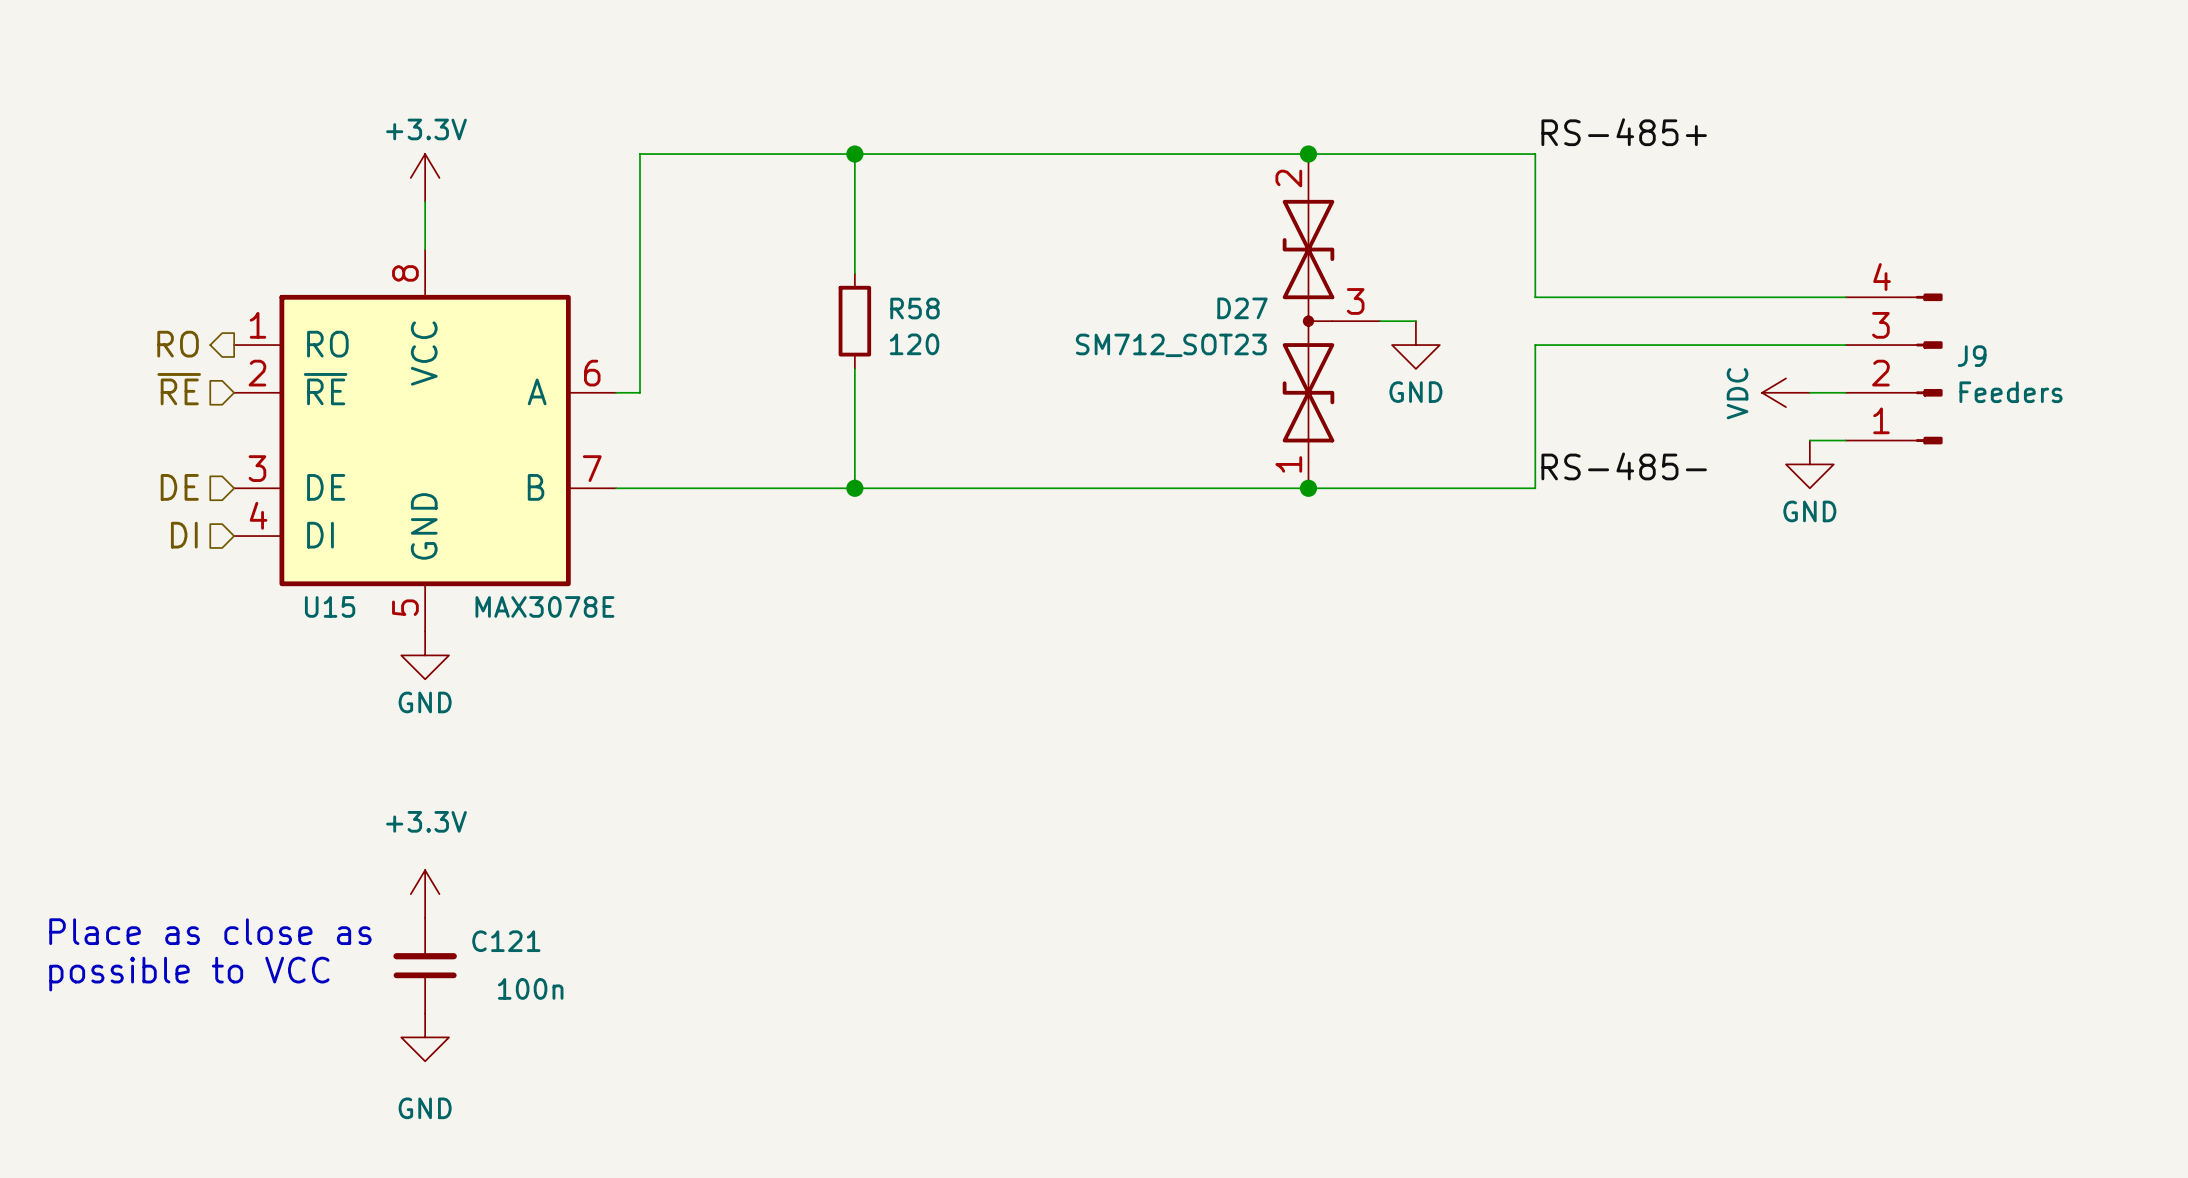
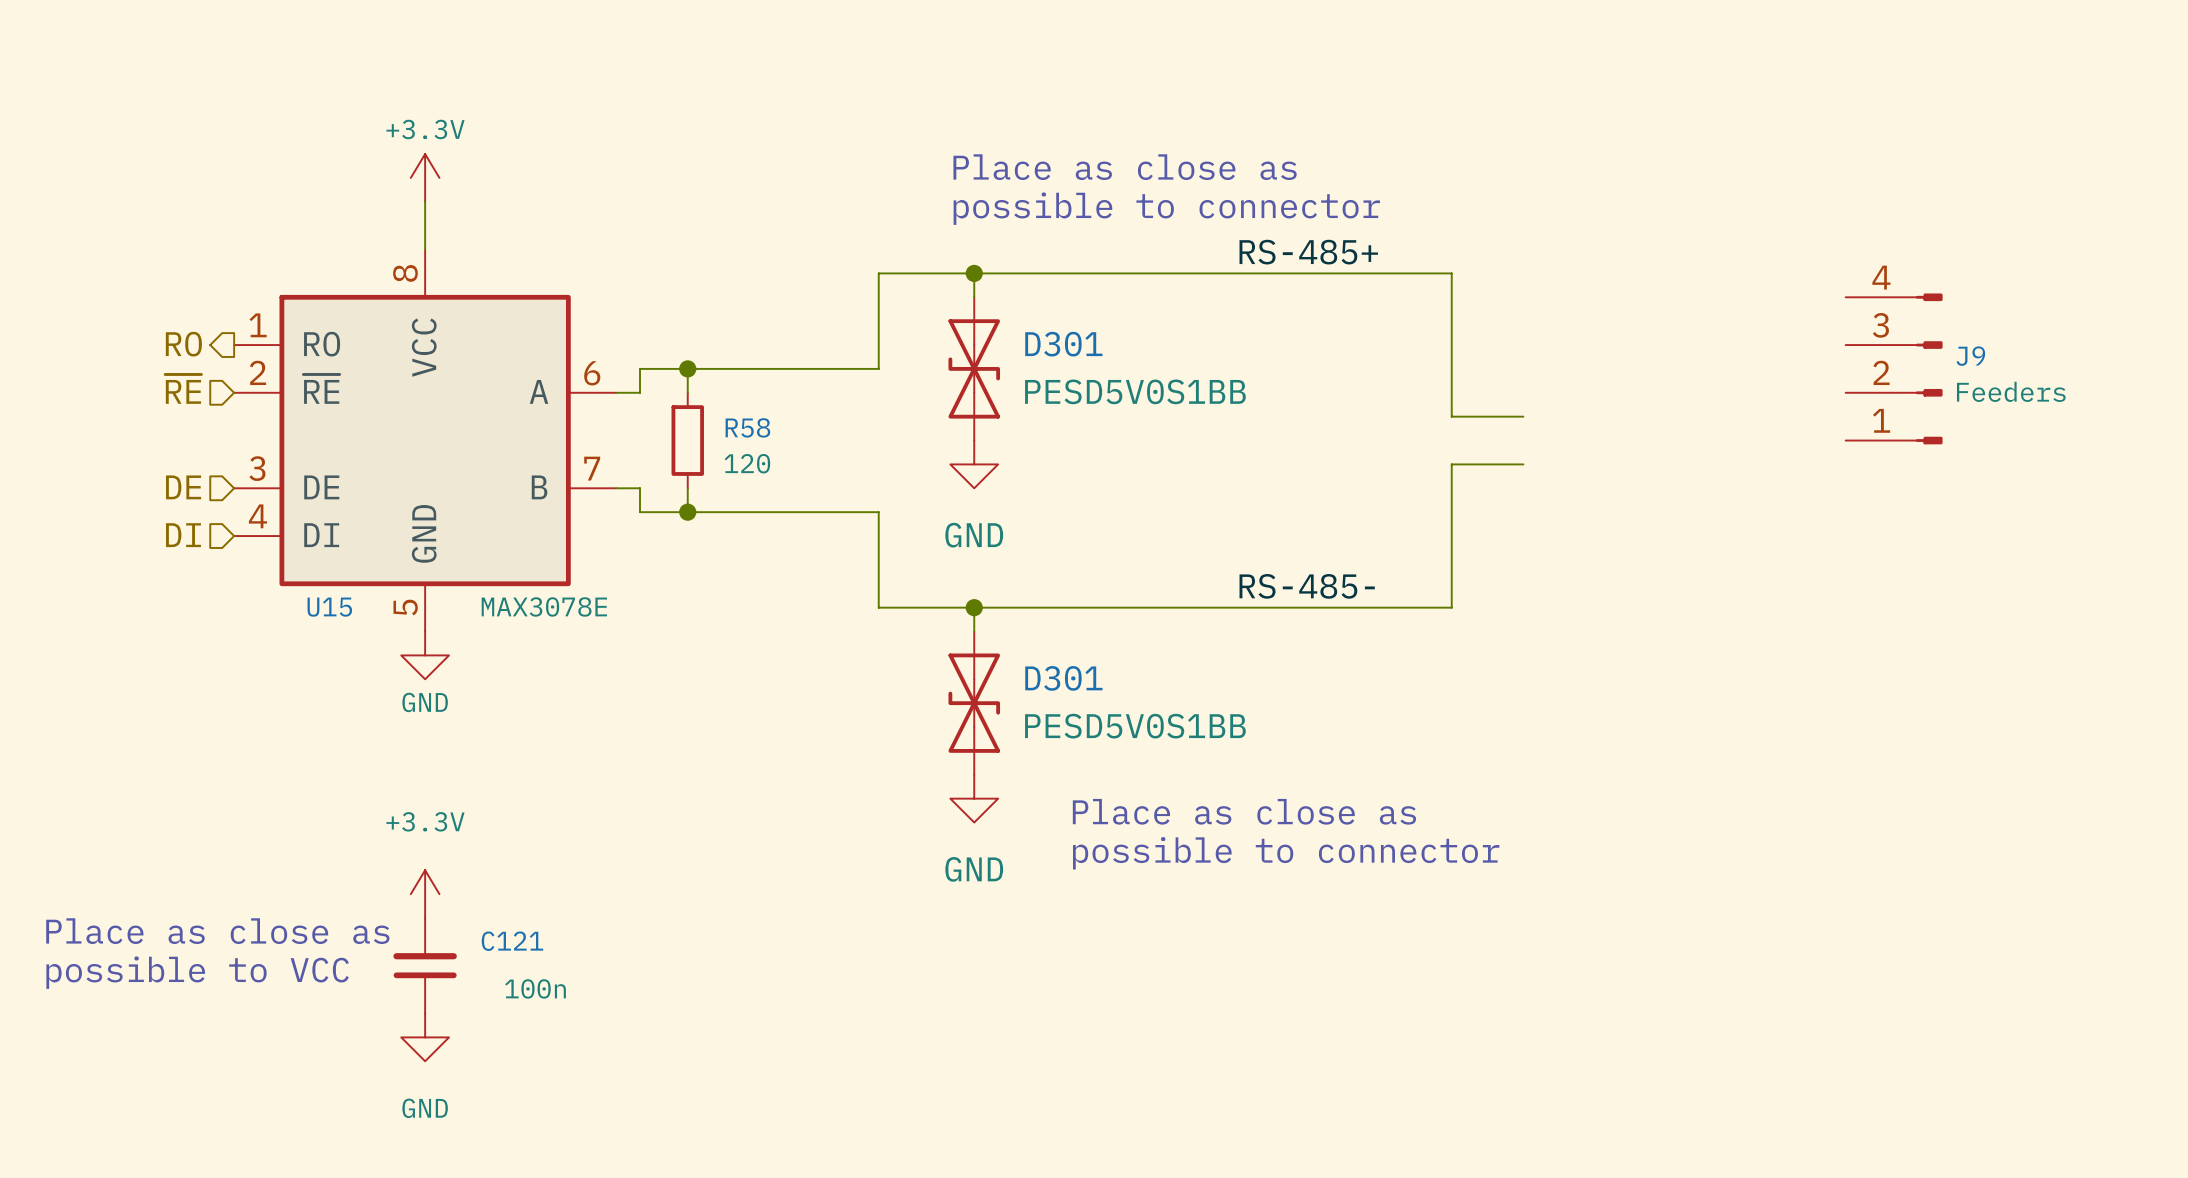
label position: RS-485+ (1624, 132) -> RS-485+ (1308, 252)
wire: (854, 154) (854, 273) -> none
junction: (854, 154) -> none
junction: (1308, 154) -> none
text: none -> Place as close as (1125, 167)
text: none -> possible to connector (1166, 208)
wire: none -> (974, 273) (974, 297)
junction: none -> (974, 273)
wire: (1845, 297) (1535, 297) (1535, 154) (640, 154) (640, 368) -> (1523, 416) (1451, 416) (1451, 273) (878, 273) (878, 368) (640, 368)
R58 position: (854, 321) -> (687, 440)
D27: SM712_SOT23 (1331, 321) -> none
wire: (1380, 321) (1415, 321) -> none
power symbol: GND (1415, 345) -> none
wire: (1845, 345) (1535, 345) (1535, 488) (640, 488) -> (1523, 464) (1451, 464) (1451, 607) (878, 607) (878, 512) (640, 512) (640, 488)
wire: none -> (687, 368) (687, 392)
junction: none -> (687, 368)
wire: (854, 368) (854, 488) -> none
D301: none -> PESD5V0S1BB (974, 368)
power symbol: VDC (1785, 392) -> none
wire: (1809, 392) (1845, 392) -> none
wire: (1809, 440) (1845, 440) -> none
power symbol: none -> GND (974, 464)
power symbol: GND (1809, 464) -> none
label position: RS-485- (1624, 466) -> RS-485- (1307, 586)
wire: none -> (687, 488) (687, 512)
junction: (854, 488) -> none
junction: (1308, 488) -> none
junction: none -> (687, 512)
wire: none -> (974, 607) (974, 631)
junction: none -> (974, 607)
D301: none -> PESD5V0S1BB (974, 703)
power symbol: none -> GND (974, 798)
text: none -> Place as close as (1244, 811)
text: none -> possible to connector (1286, 853)

